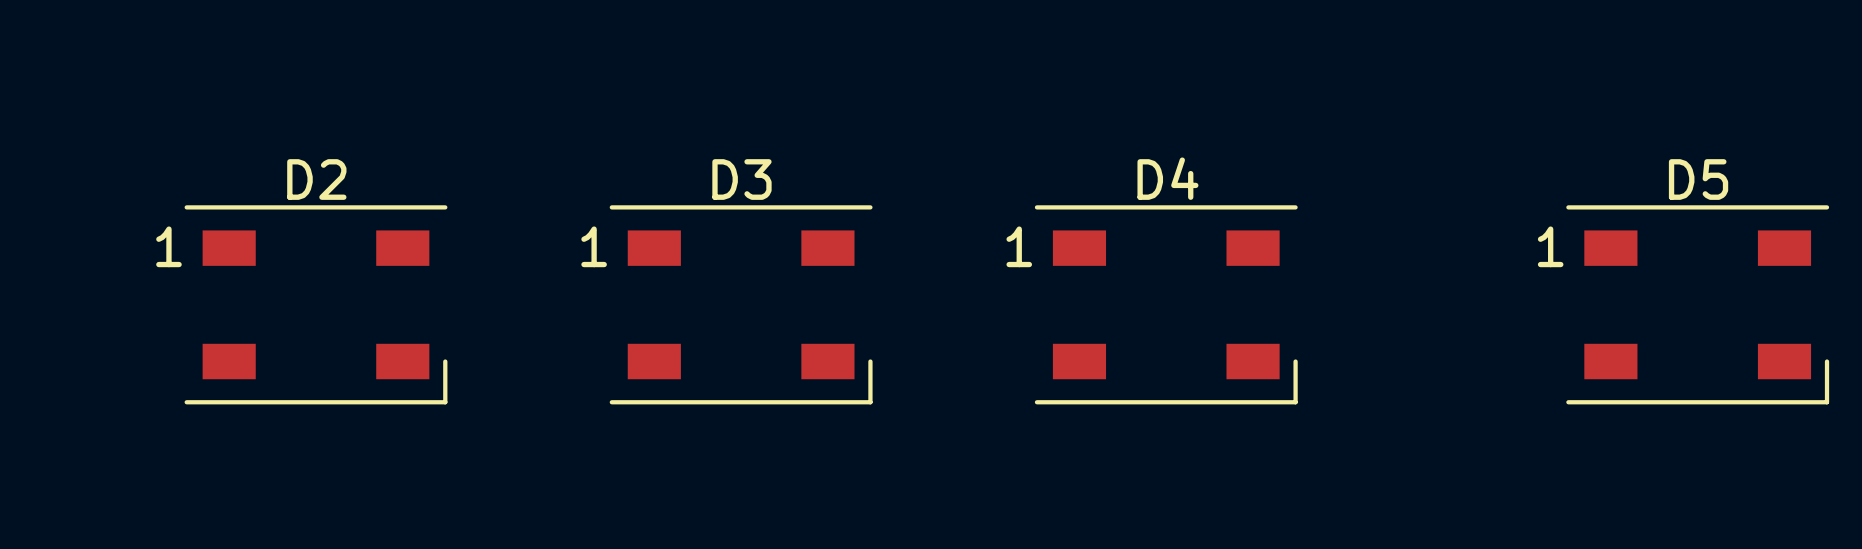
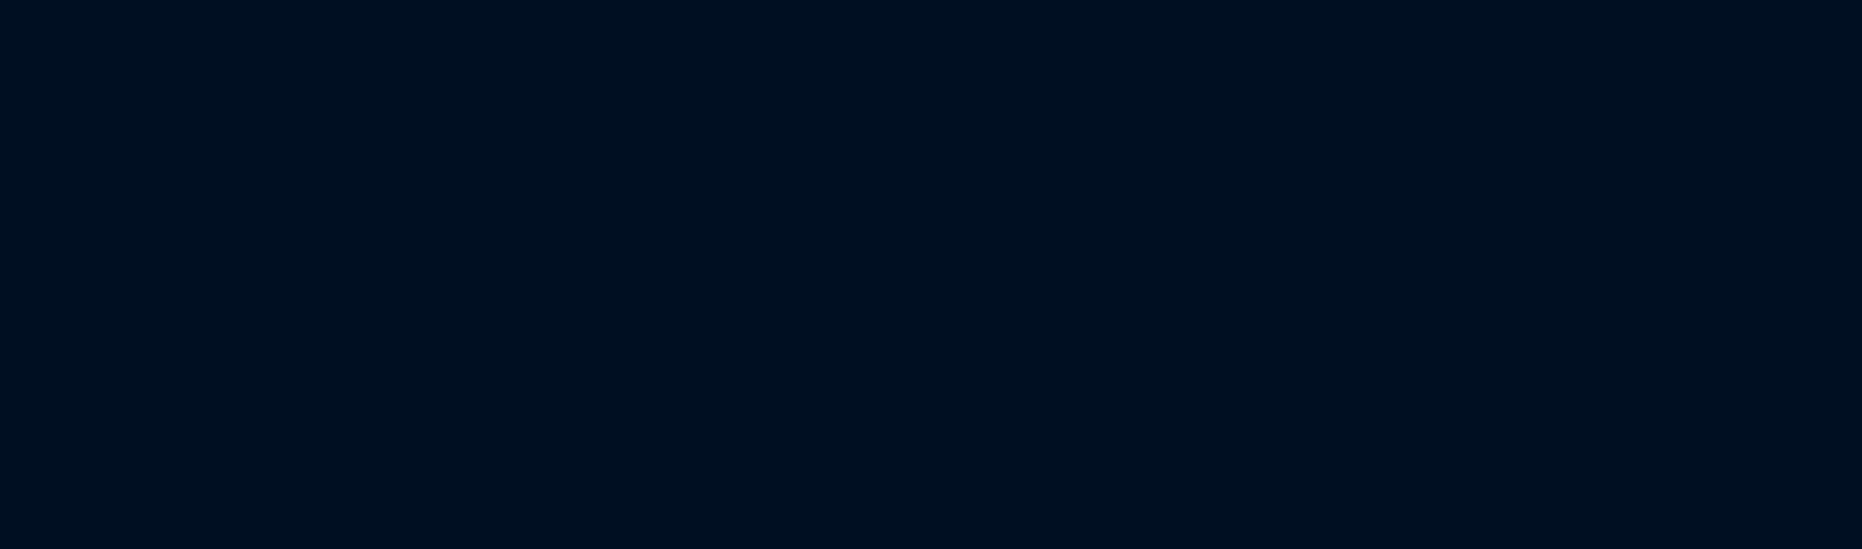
D2: (315, 304) -> none
D3: (741, 304) -> none
D4: (1166, 304) -> none
D5: (1697, 304) -> none

